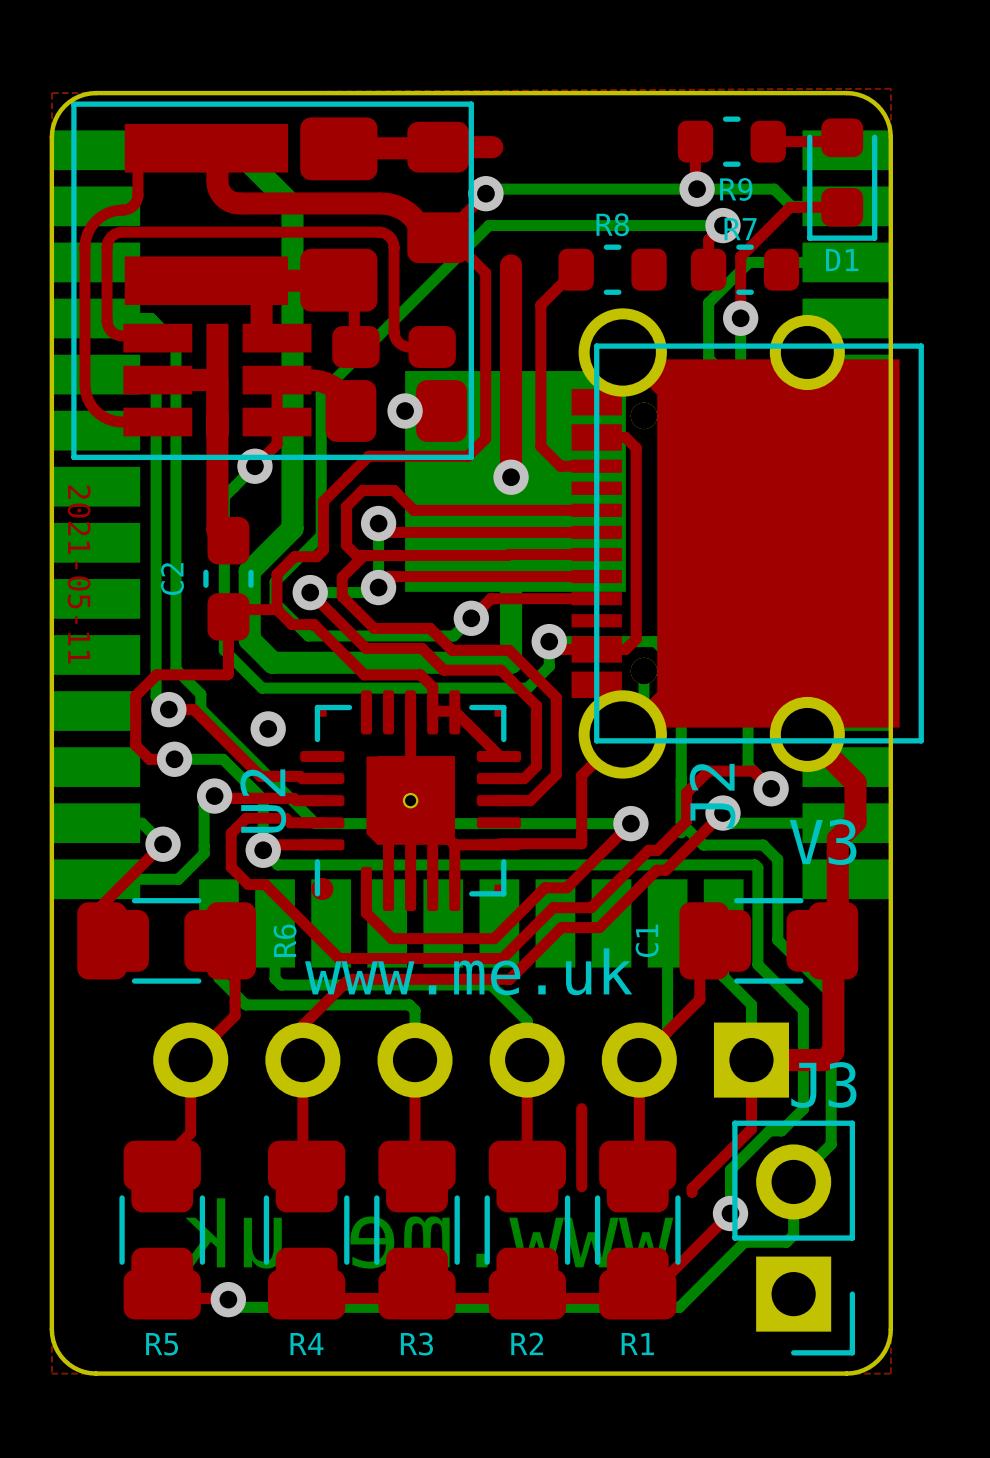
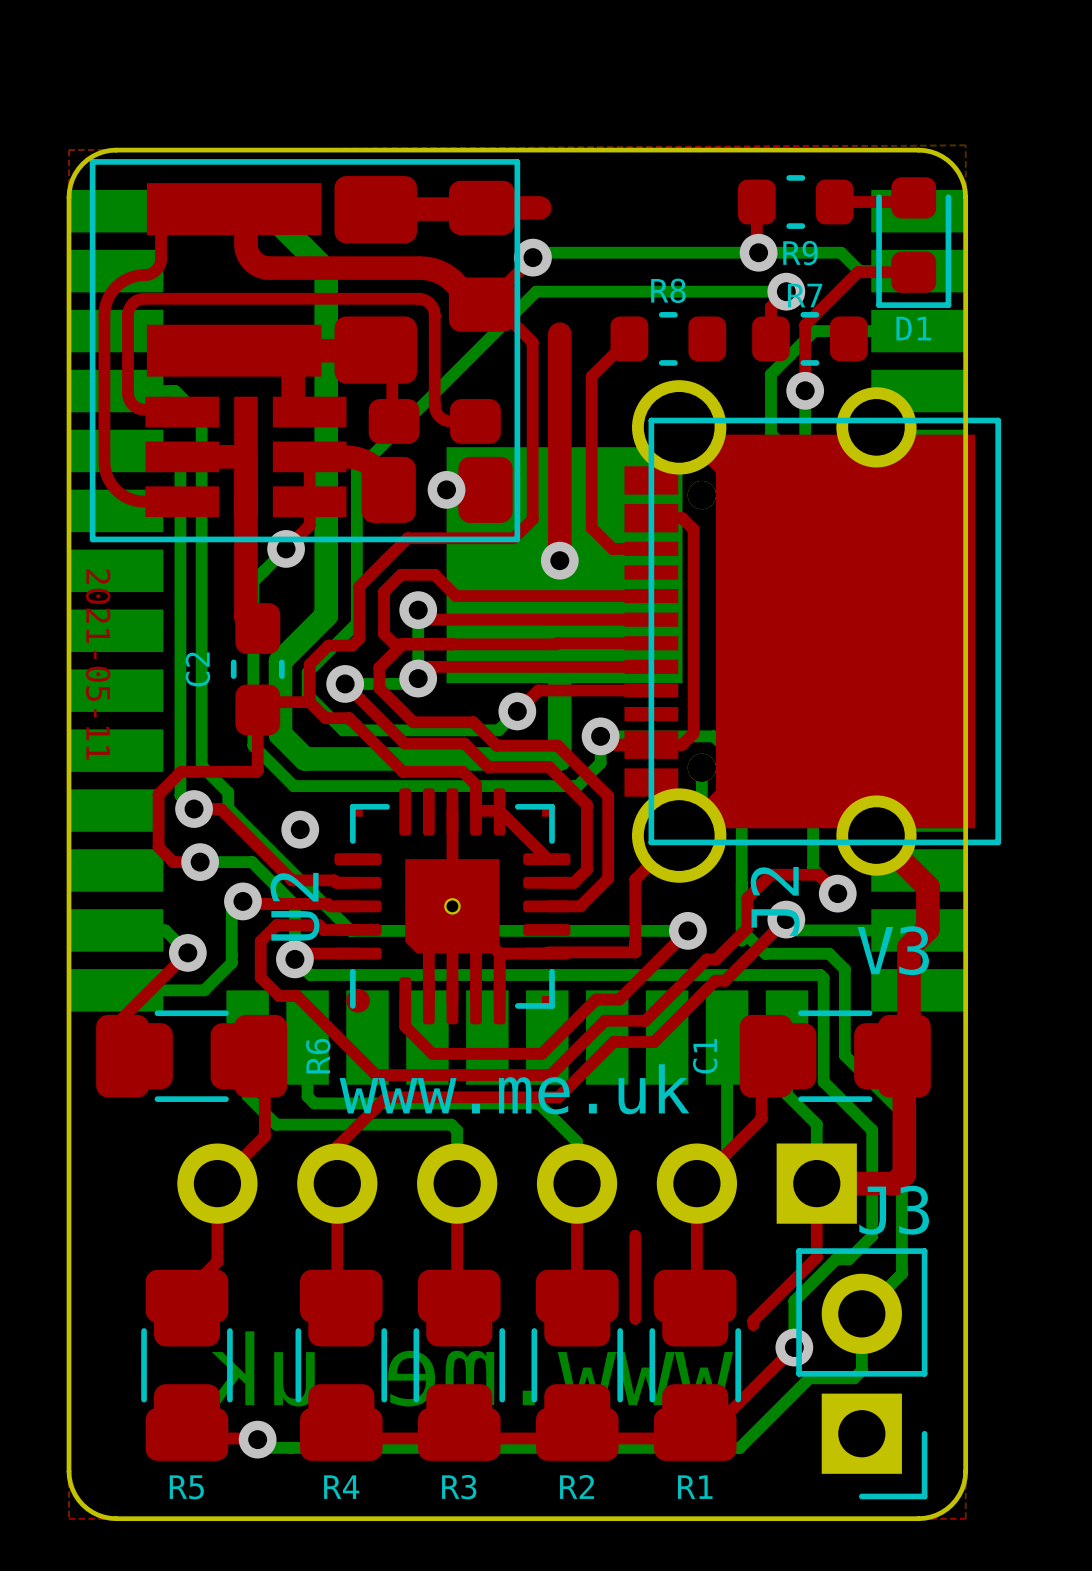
U2 footprint: [300, 690, 521, 912] -> [334, 788, 571, 1025]

